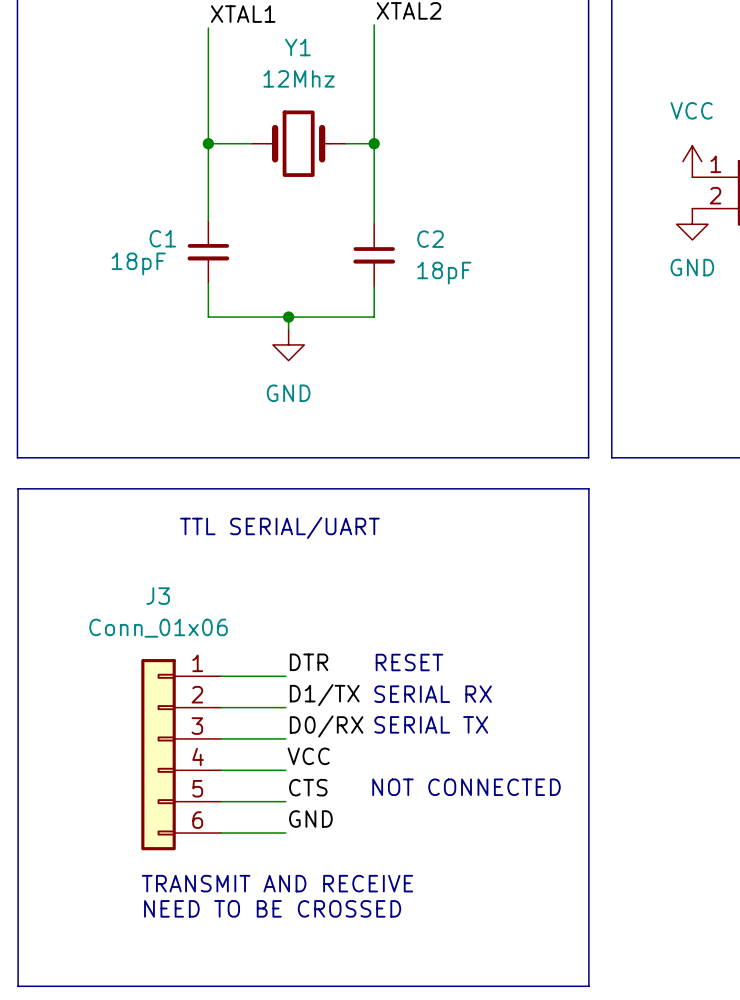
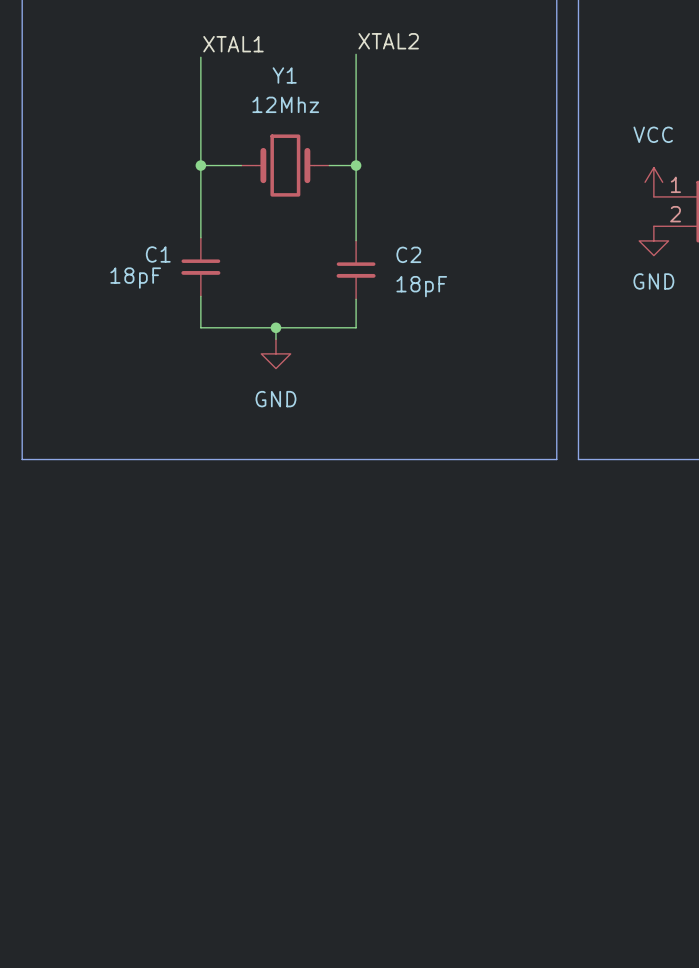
line: (18, 488) (18, 986) (588, 986) (588, 488) (18, 488) -> none
text: TTL SERIAL/UART (279, 527) -> none
label: DTR (309, 662) -> none
text: RESET (409, 662) -> none
wire: (221, 676) (285, 676) -> none
text: SERIAL RX (433, 694) -> none
label: D1/TX (324, 695) -> none
wire: (221, 707) (285, 707) -> none
text: SERIAL TX (431, 724) -> none
label: D0/RX (326, 726) -> none
wire: (221, 738) (285, 738) -> none
J3: Conn_01x06 (181, 754) -> none
label: VCC (308, 756) -> none
wire: (221, 770) (285, 770) -> none
label: CTS (308, 787) -> none
text: NOT CONNECTED (466, 787) -> none
wire: (221, 801) (285, 801) -> none
label: GND (310, 819) -> none
wire: (221, 833) (285, 833) -> none
text: TRANSMIT AND RECEIVE (277, 883) -> none
text: NEED TO BE CROSSED (272, 908) -> none

